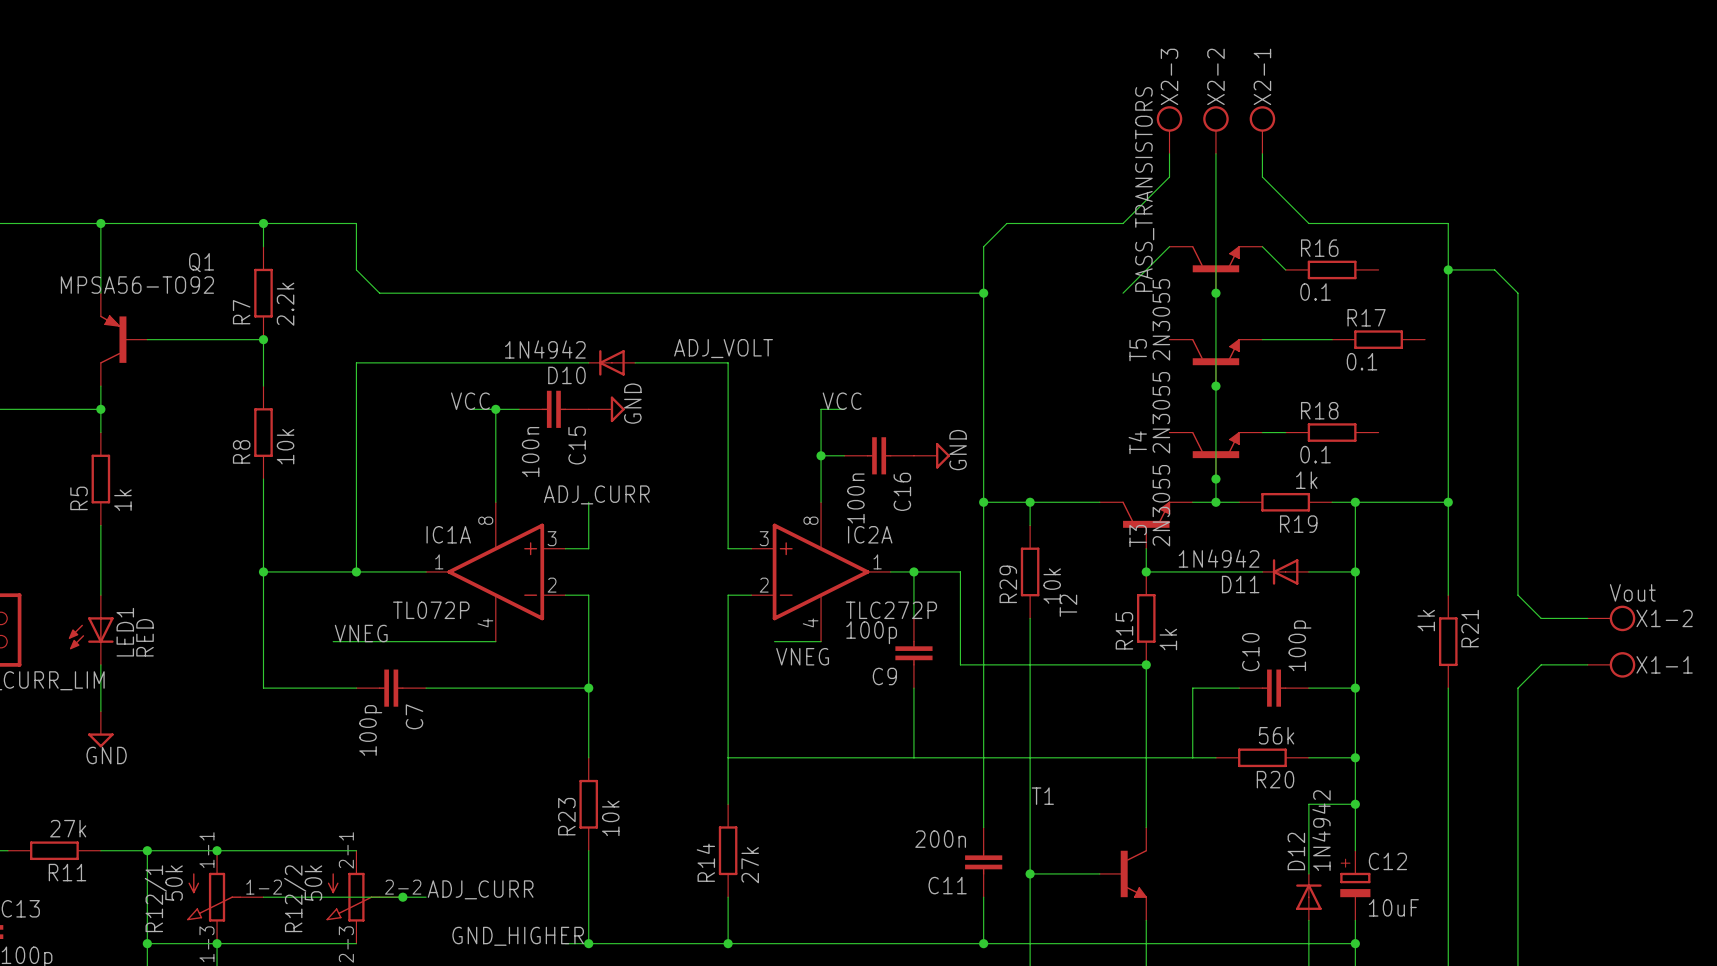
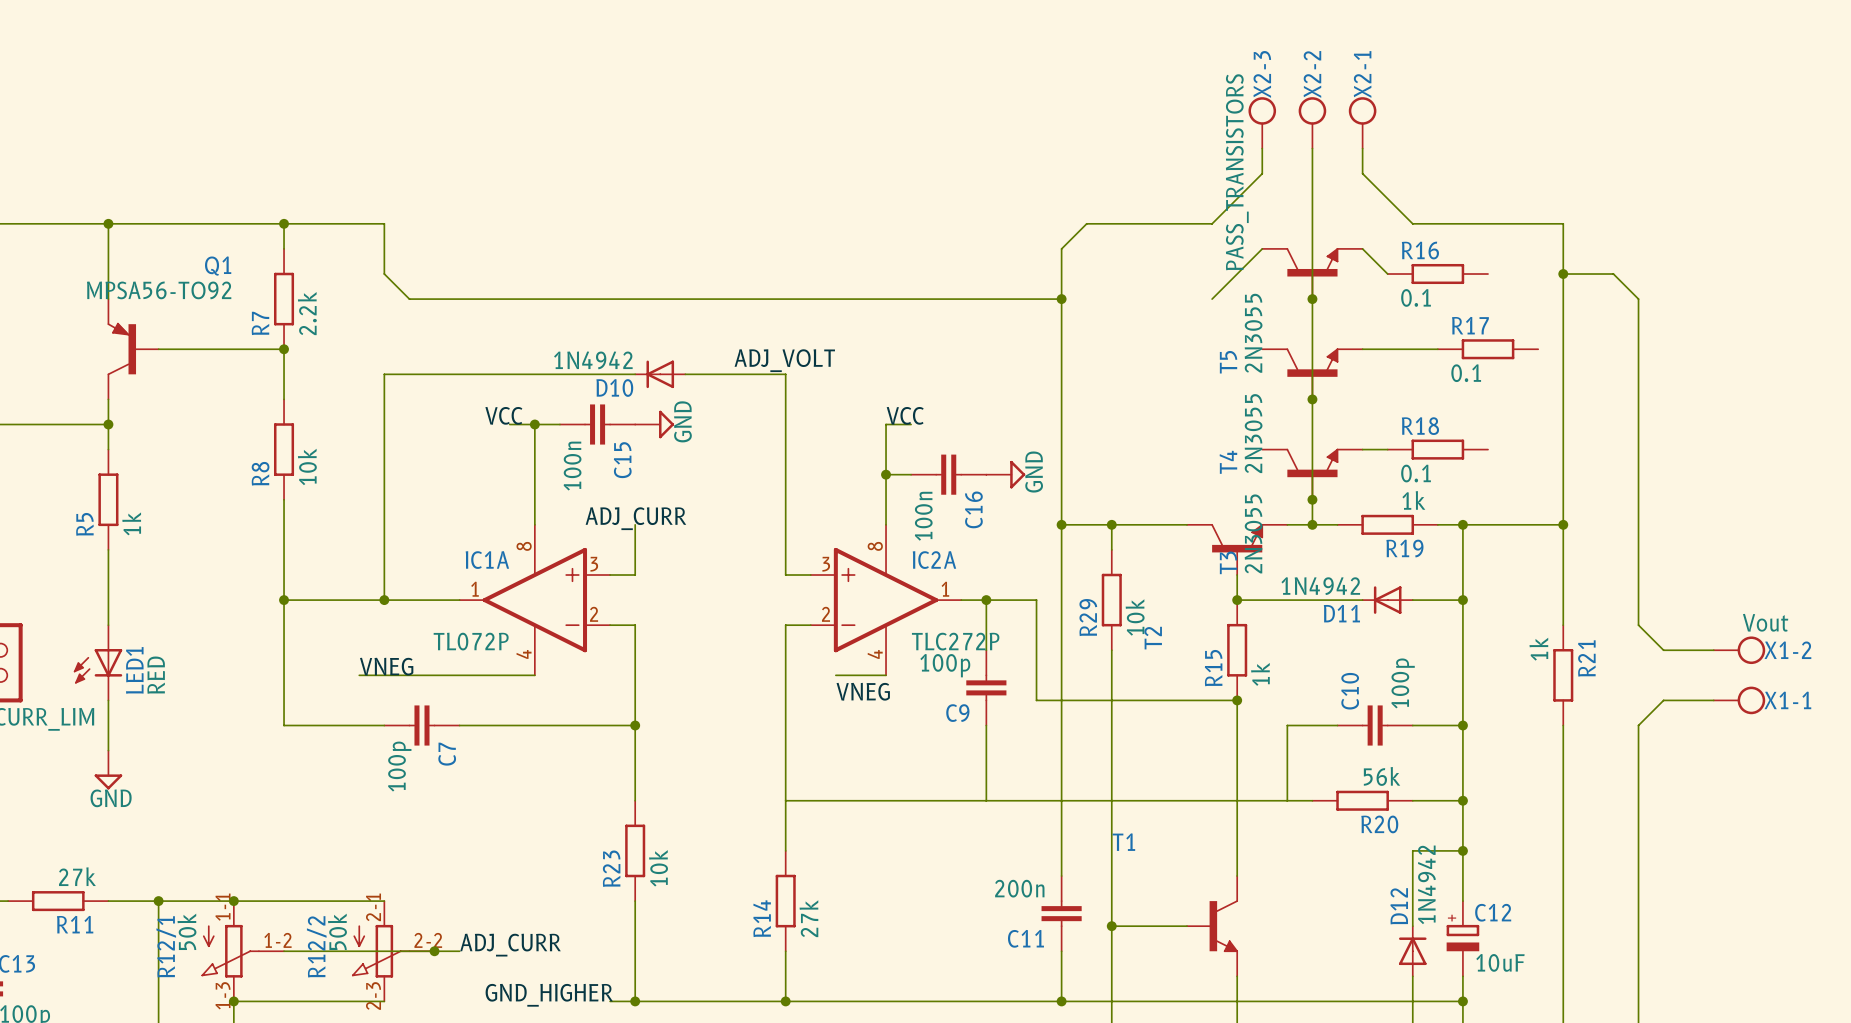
wire: (147, 943) (217, 943) -> none
junction: (147, 943) -> none

